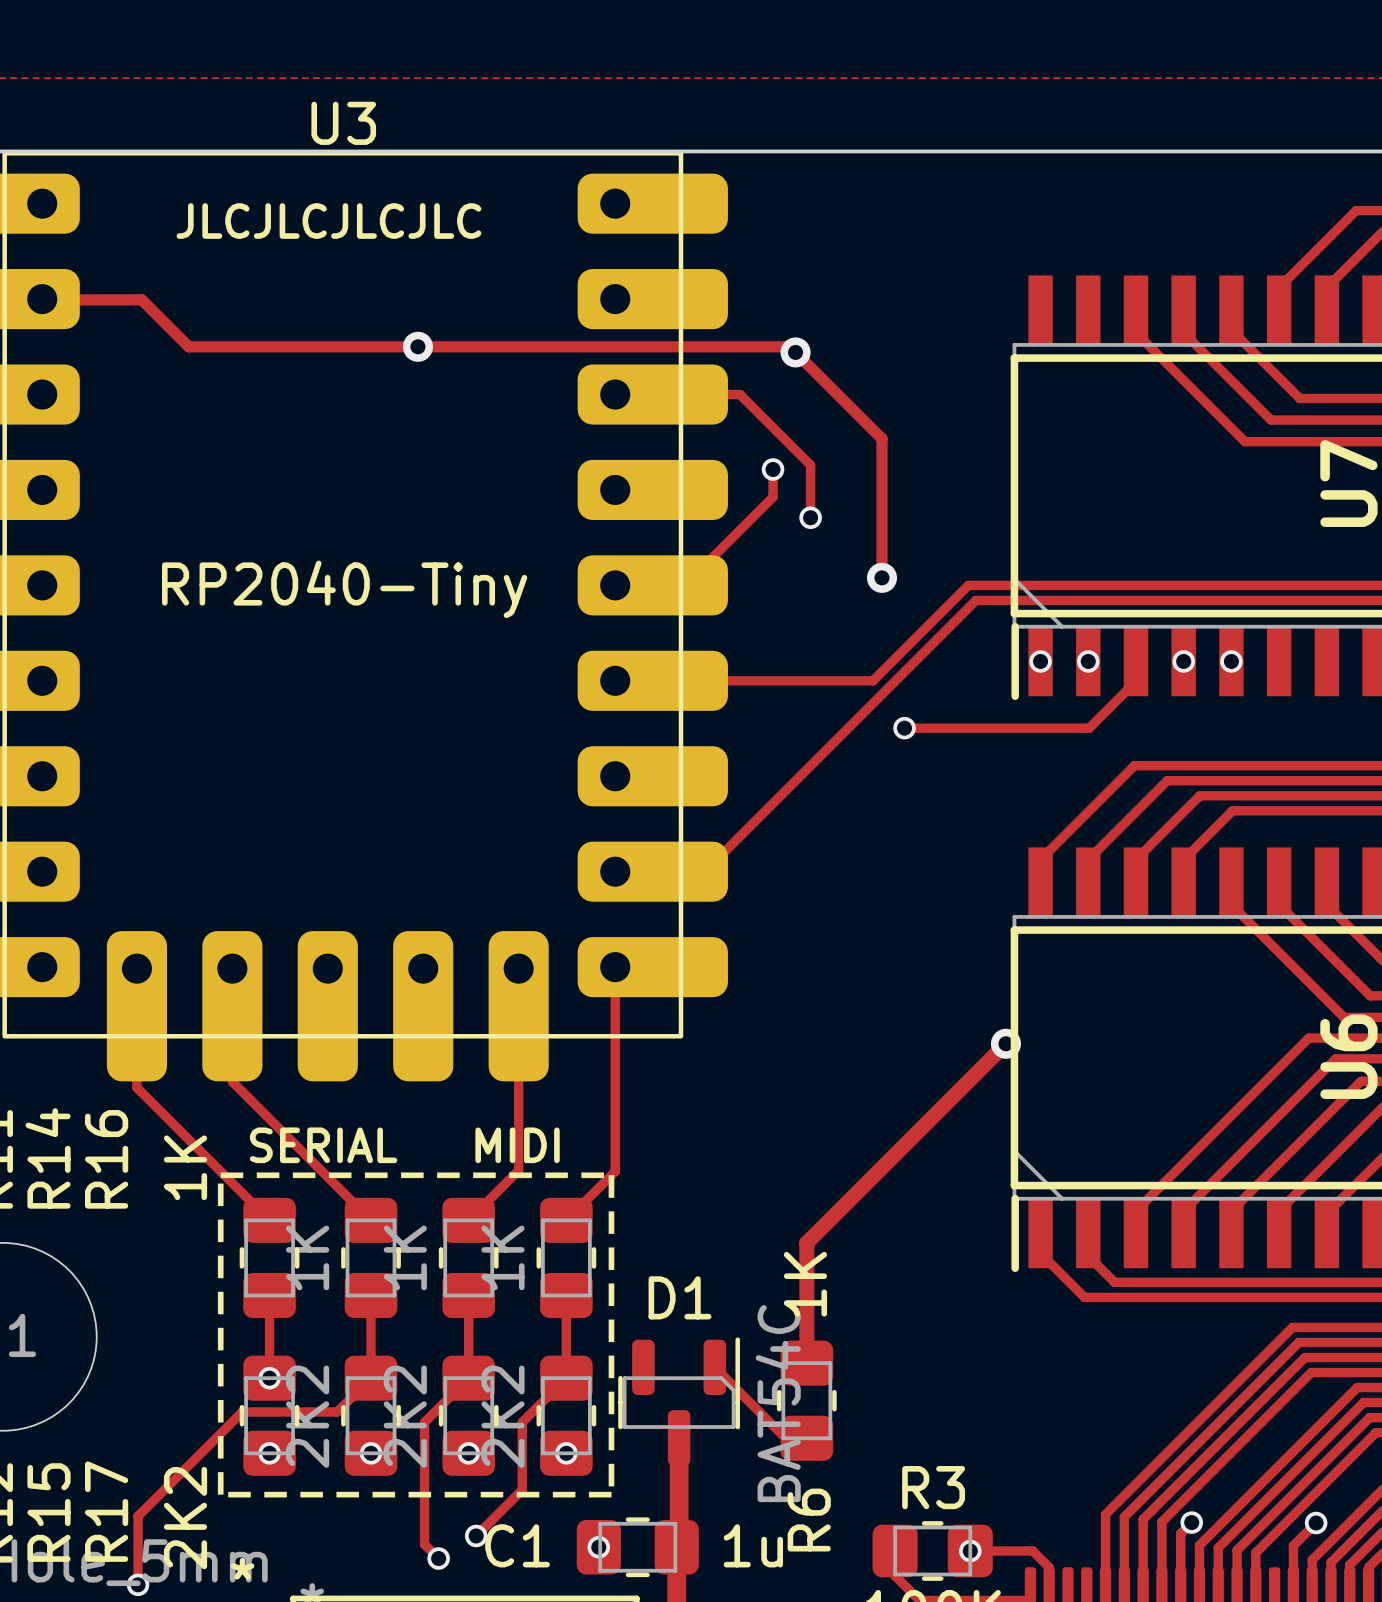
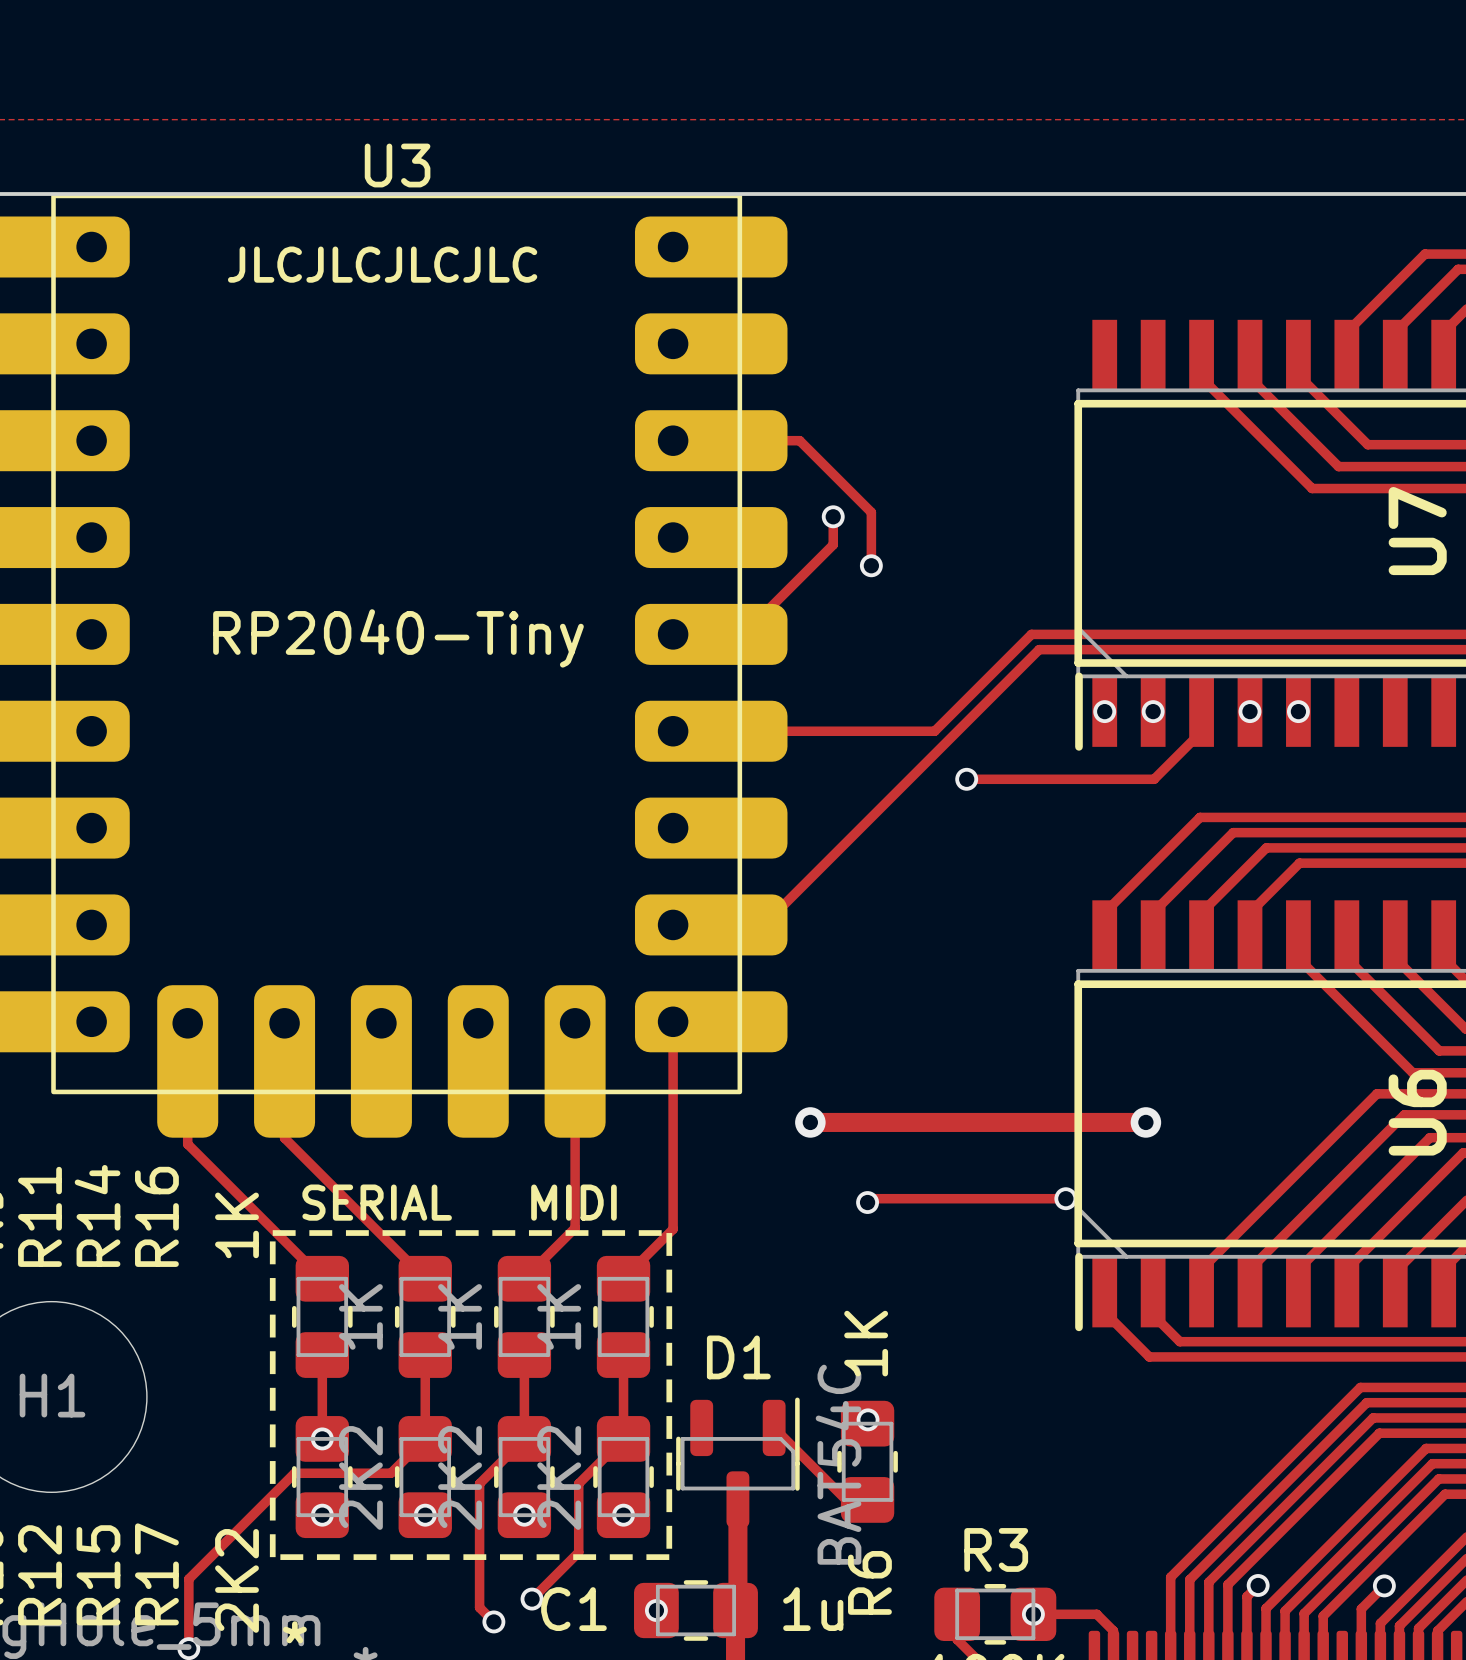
track: (42, 299) (141, 299) (188, 346) (789, 346) (881, 438) (881, 577) -> none
via: (417, 346) -> none
via: (795, 352) -> none
via: (881, 577) -> none
track: (1005, 1043) (806, 1242) (806, 1363) -> none
via position: (1005, 1043) -> (1145, 1122)
track: none -> (810, 1122) (1145, 1122)
via: none -> (810, 1122)
track: none -> (1065, 1198) (871, 1198) (867, 1202)
via: none -> (1065, 1198)
via: none -> (867, 1202)
via: none -> (868, 1419)

